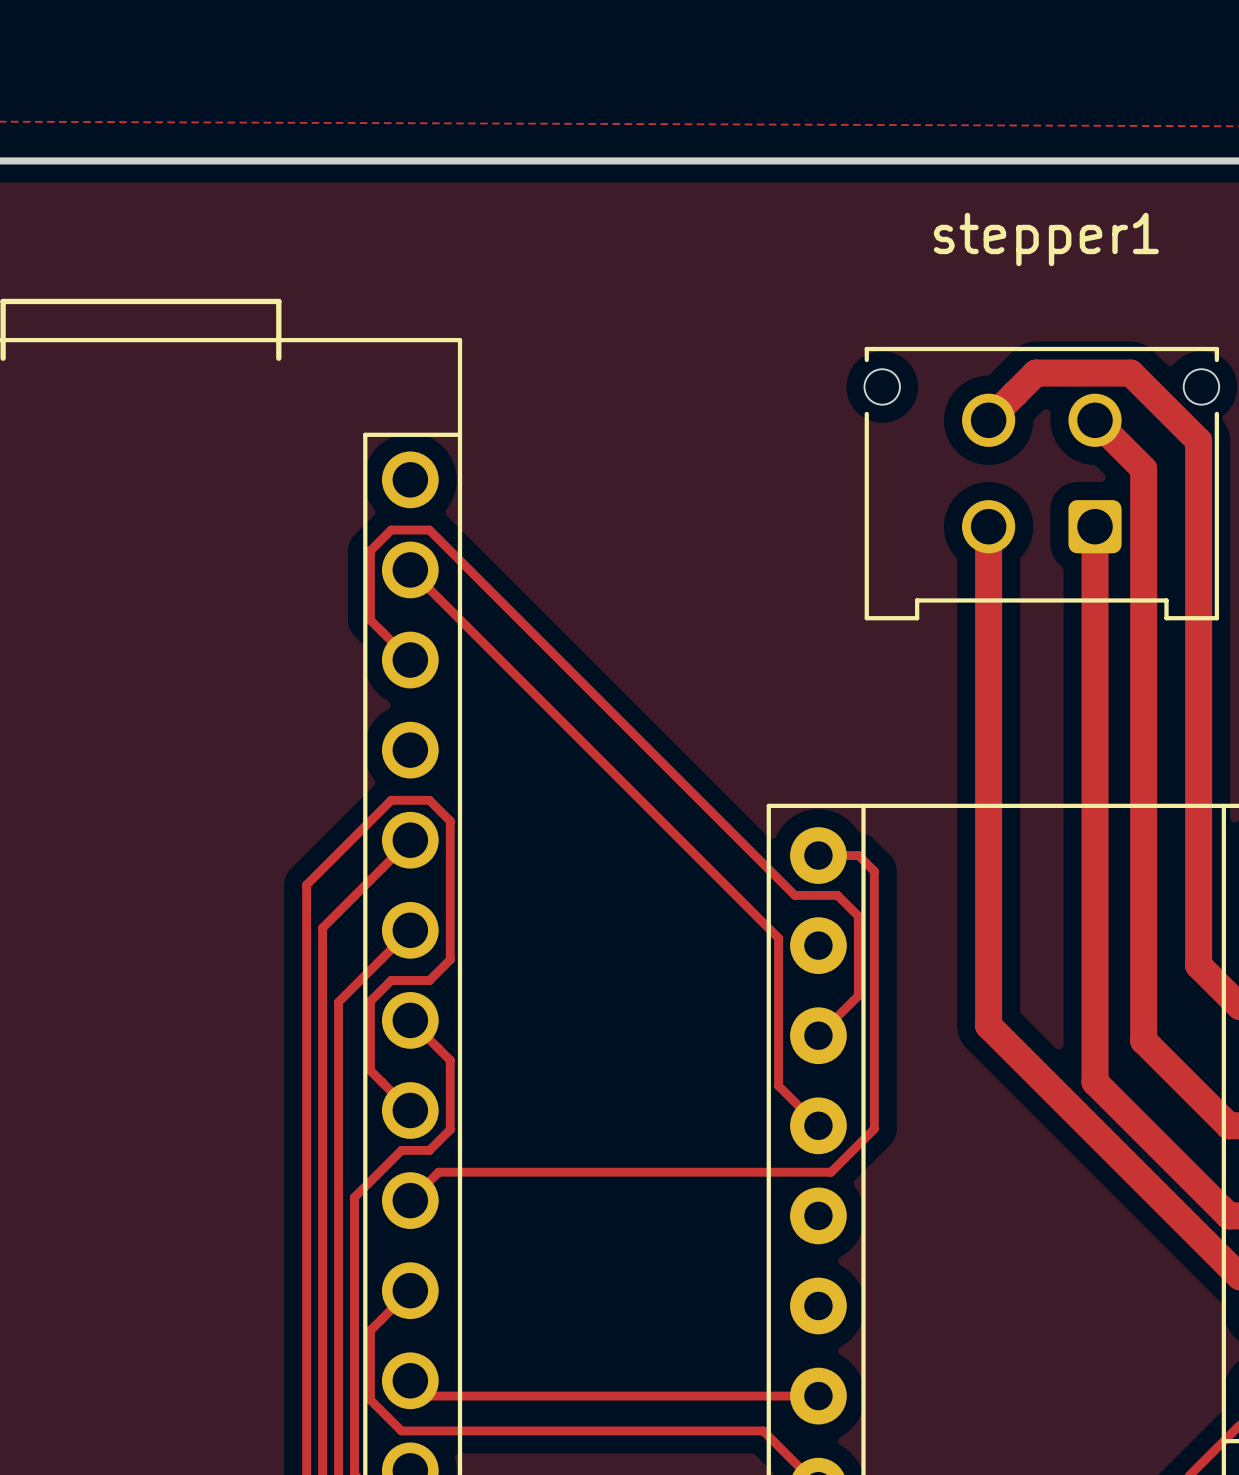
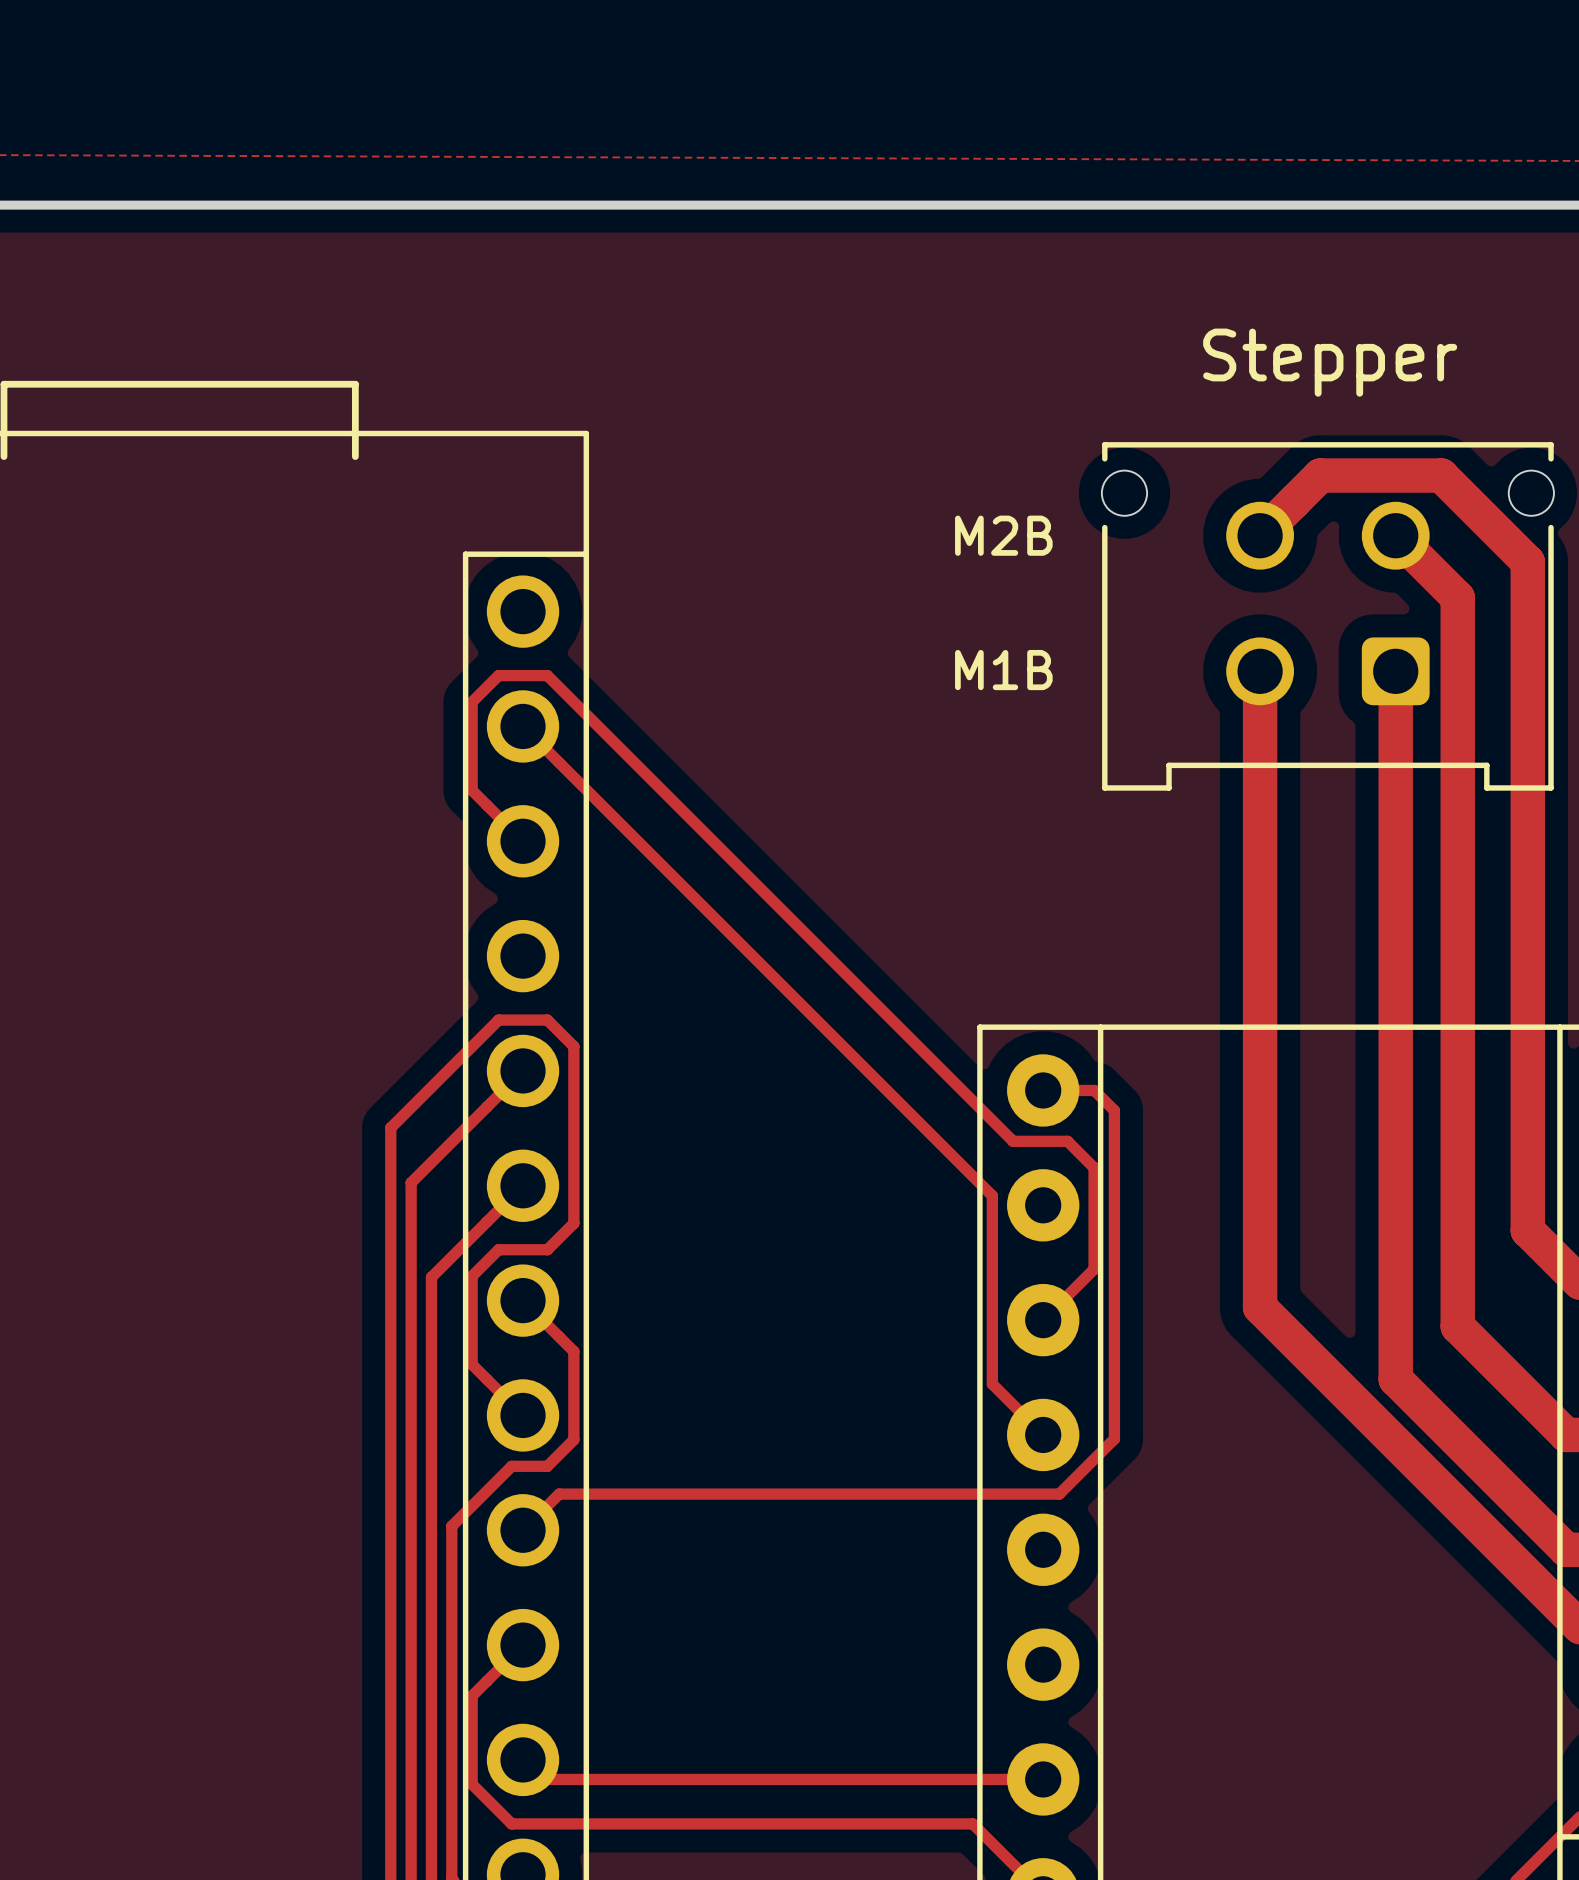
stepper1 name: stepper1 (1046, 239) -> Stepper (1330, 362)
text: none -> M2B (1003, 535)
text: none -> M1B (1003, 670)

